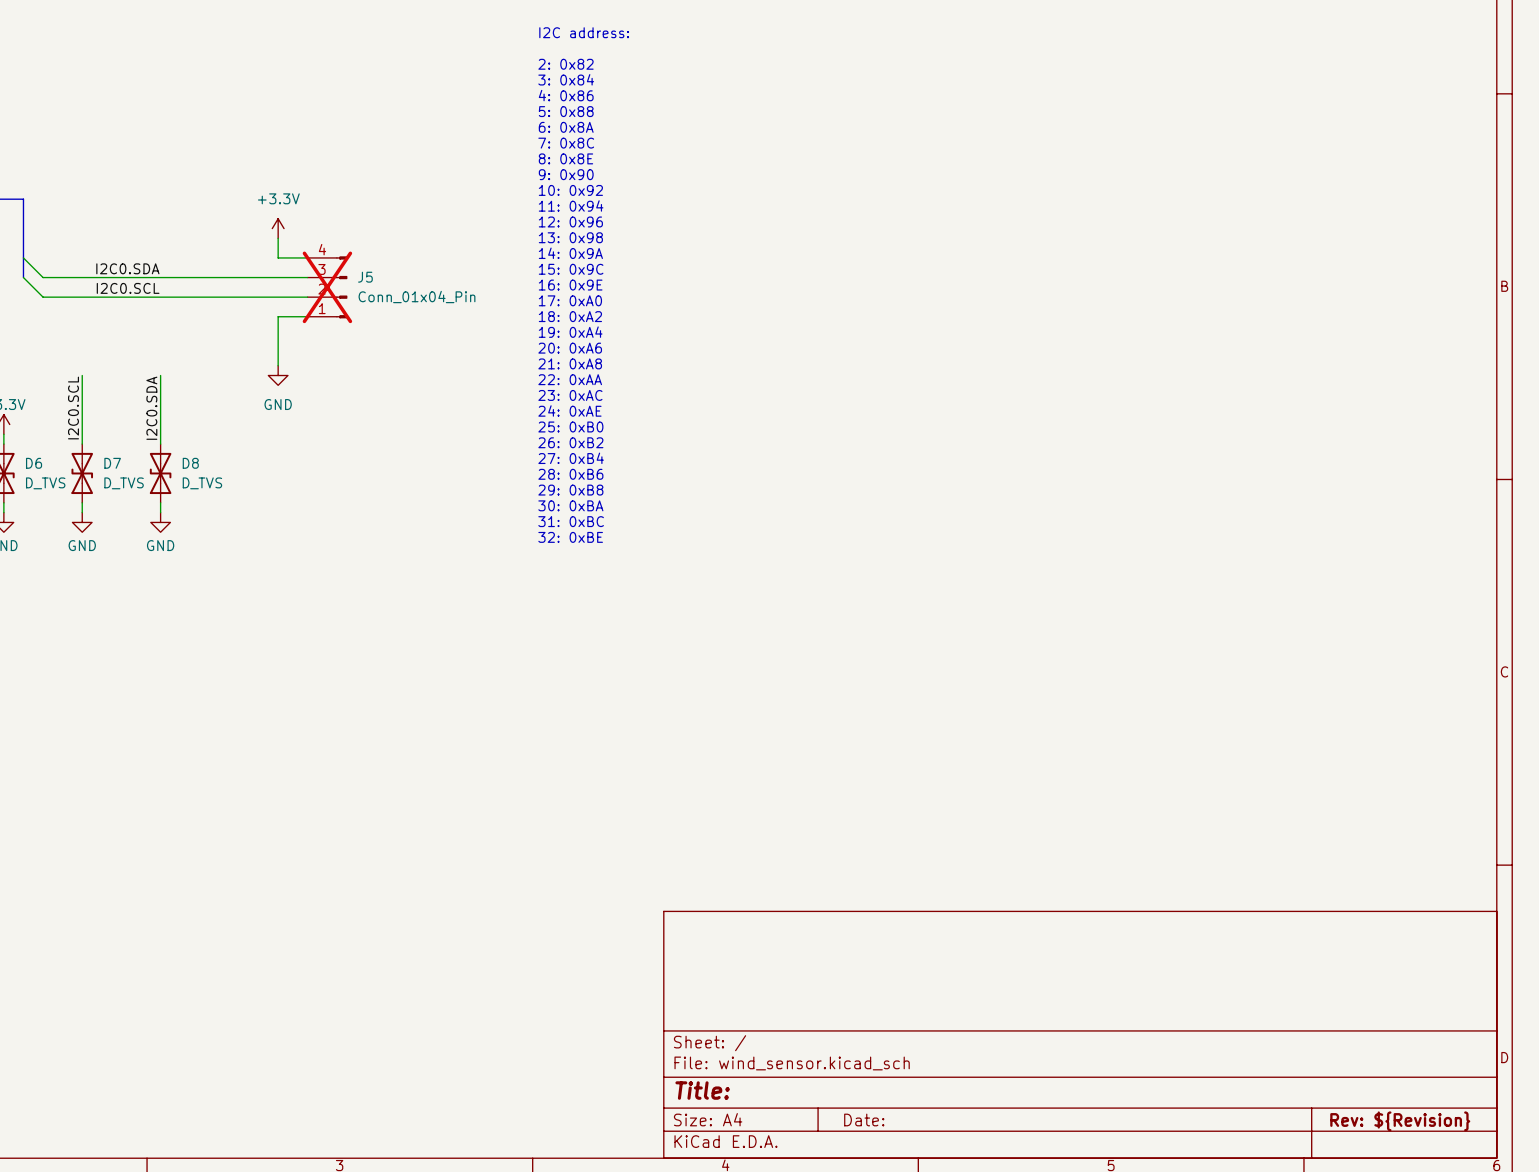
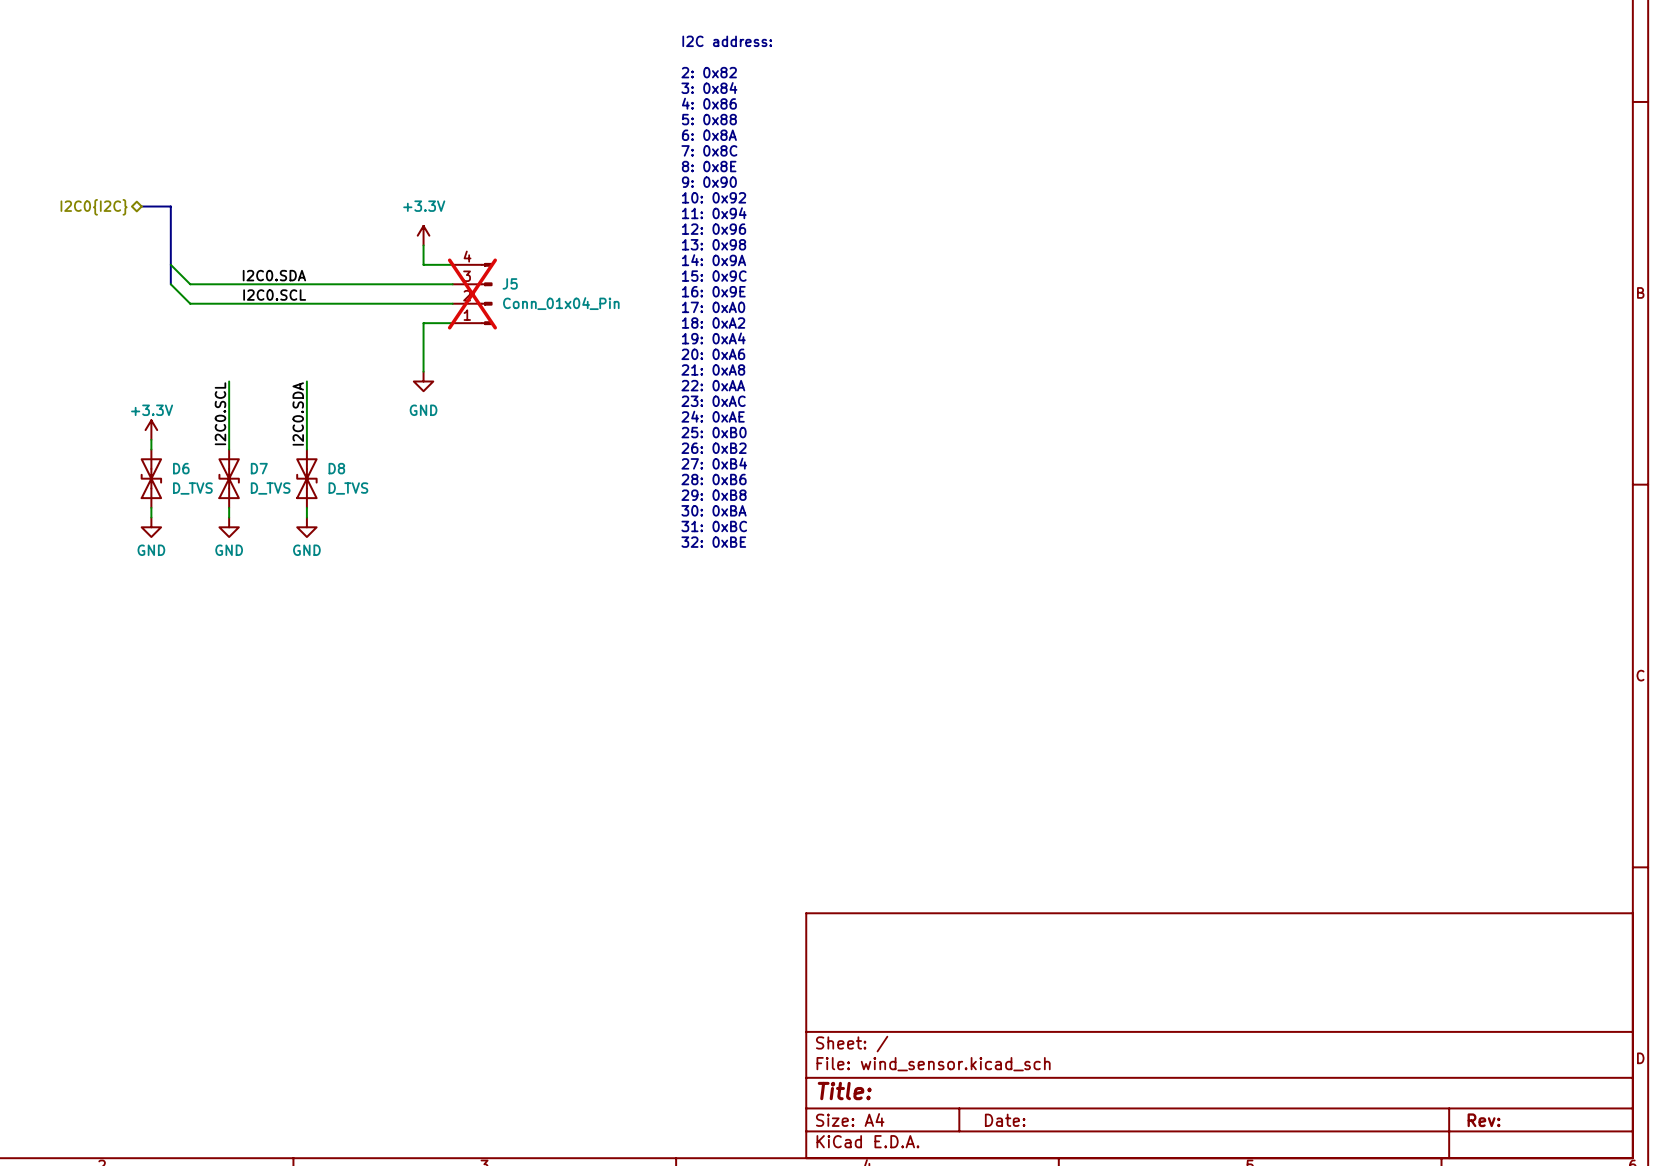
title block: Rev: ${Revision} (1400, 1121) -> Rev: (1484, 1120)

